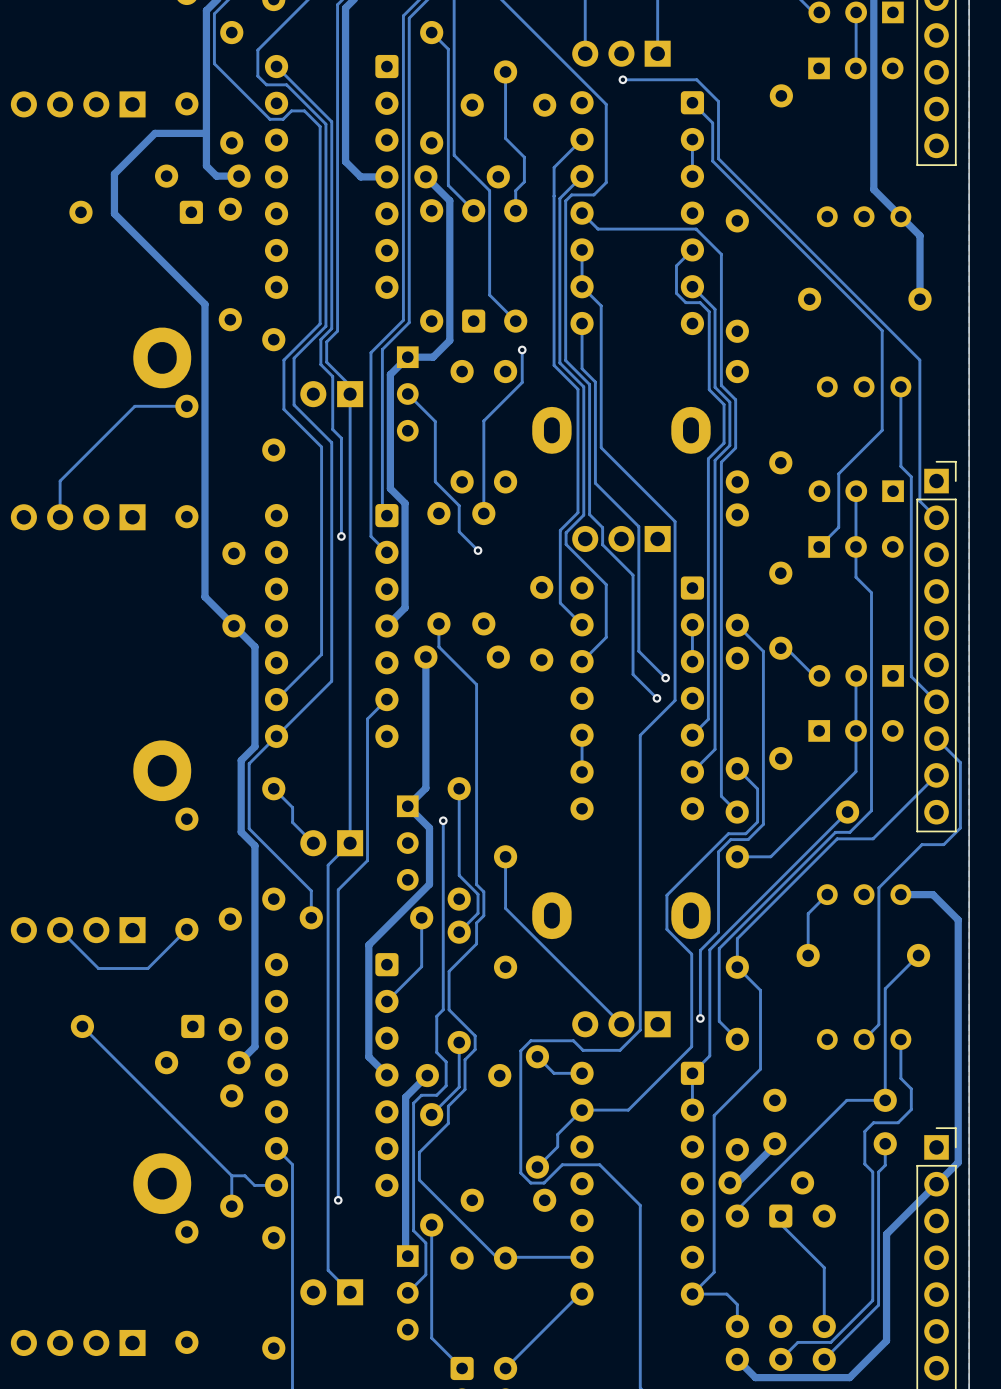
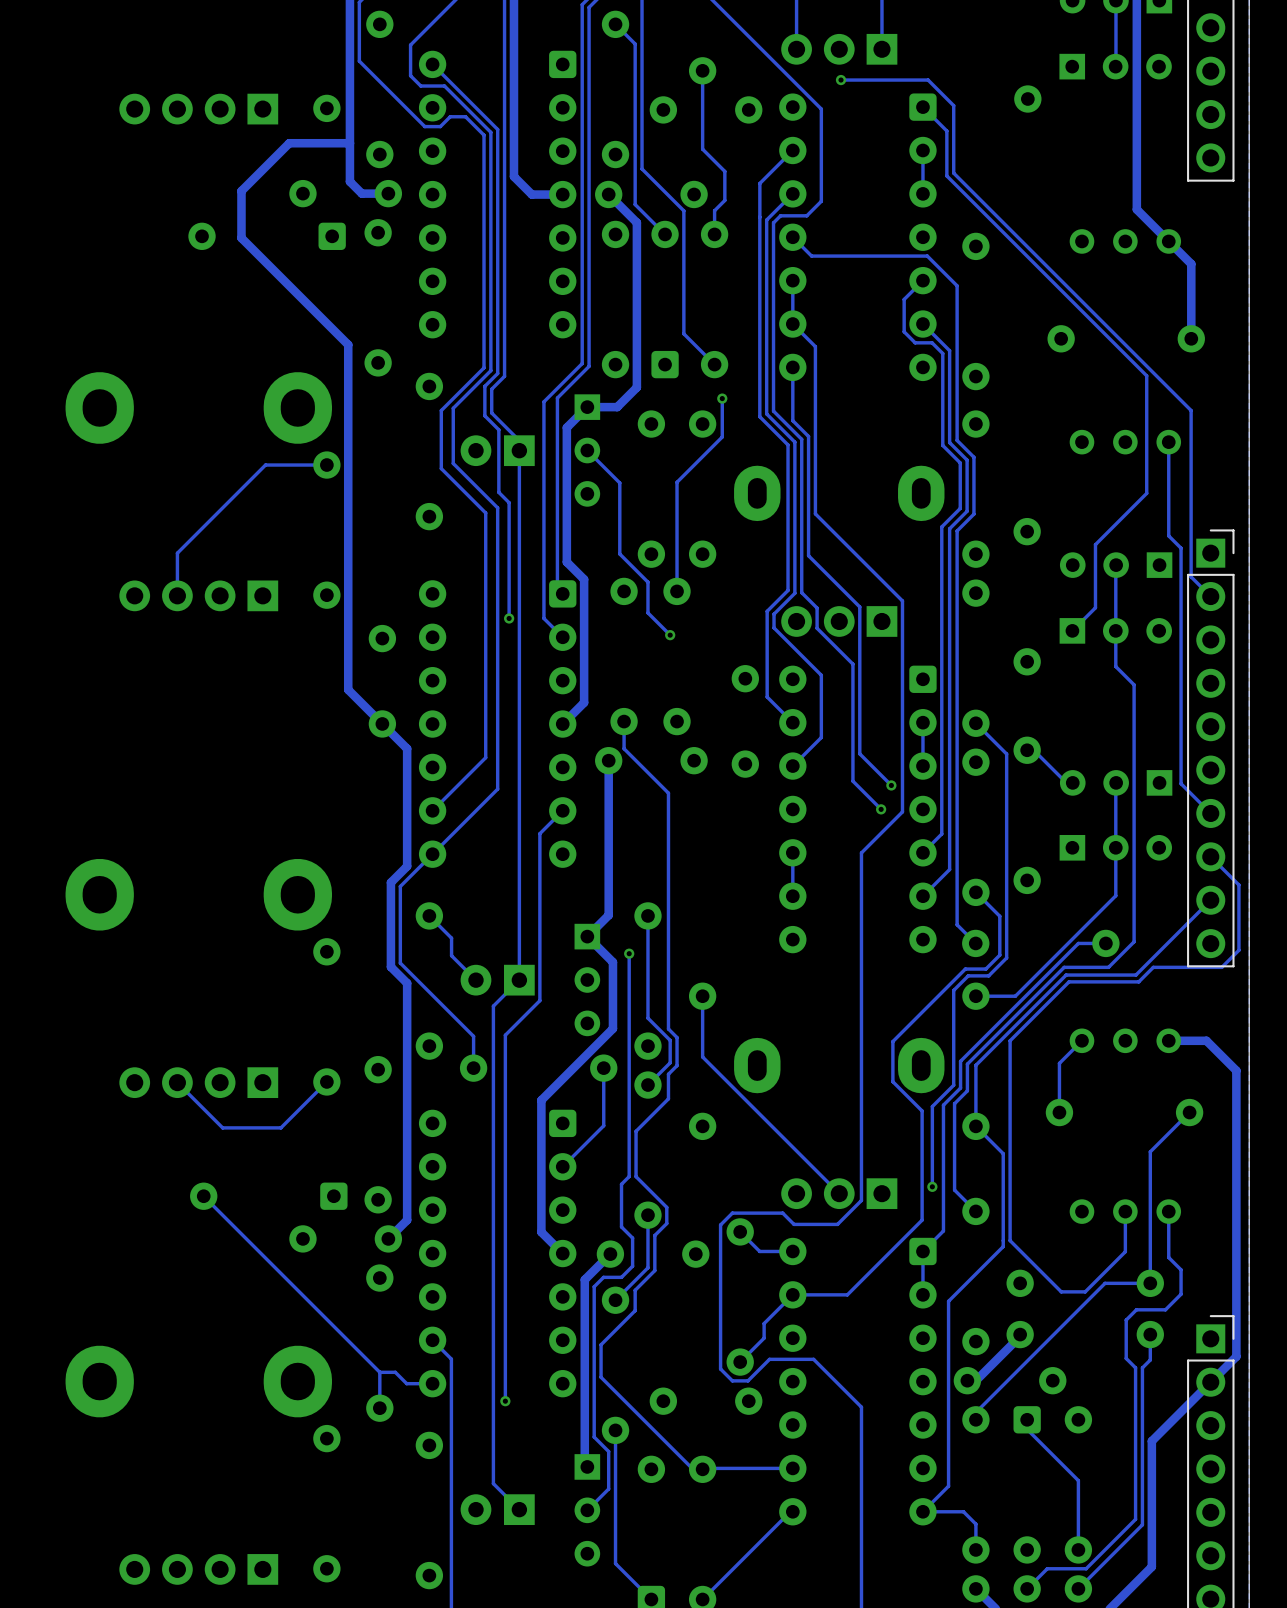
track: (847, 812) (709, 949) -> (1105, 943) (1078, 943) (960, 1061) (960, 1088) (943, 1105)
track: (960, 817) (960, 828) (943, 844) (922, 844) (878, 887) (878, 1024) (864, 1039) -> (1238, 950) (1221, 967) (1153, 967) (1138, 981) (1069, 981) (1010, 1040) (1010, 1240) (1061, 1291) (1085, 1291) (1125, 1251) (1125, 1211)
track: (835, 832) (719, 948) -> (1091, 967) (1064, 967) (967, 1064) (967, 1090) (954, 1104)
track: (837, 838) (737, 938) -> (1093, 975) (1066, 975) (975, 1065) (975, 1092)

